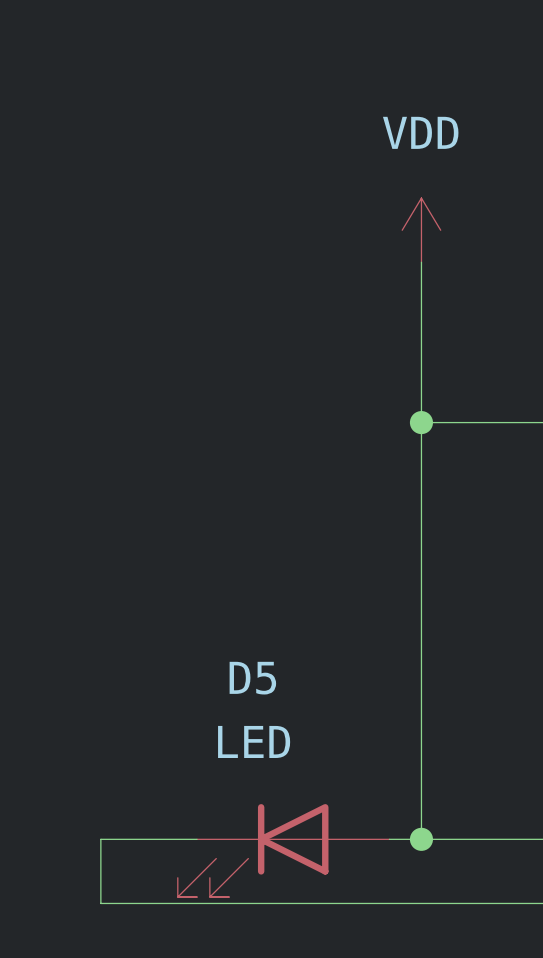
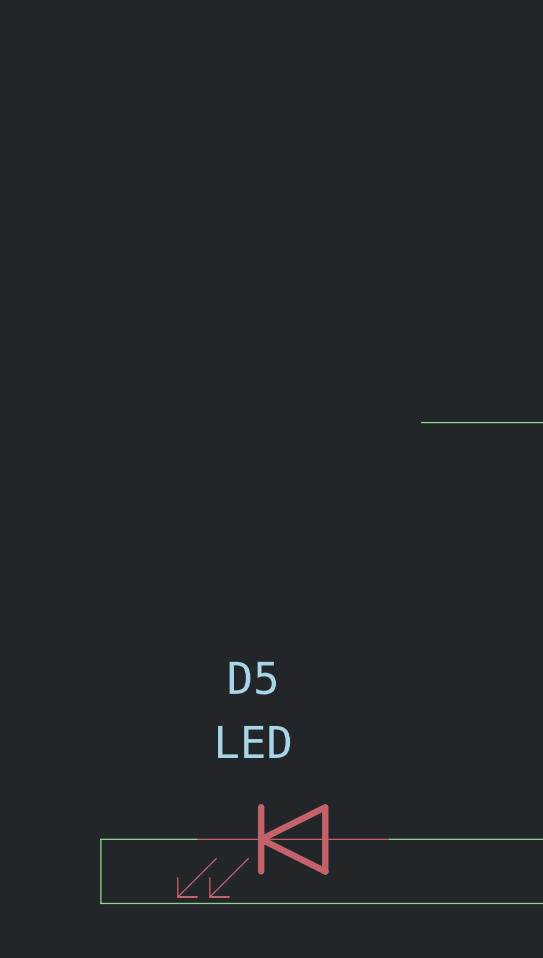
power symbol: VDD (421, 230) -> none
wire: (421, 262) (421, 839) -> none
junction: (421, 422) -> none
junction: (421, 839) -> none

